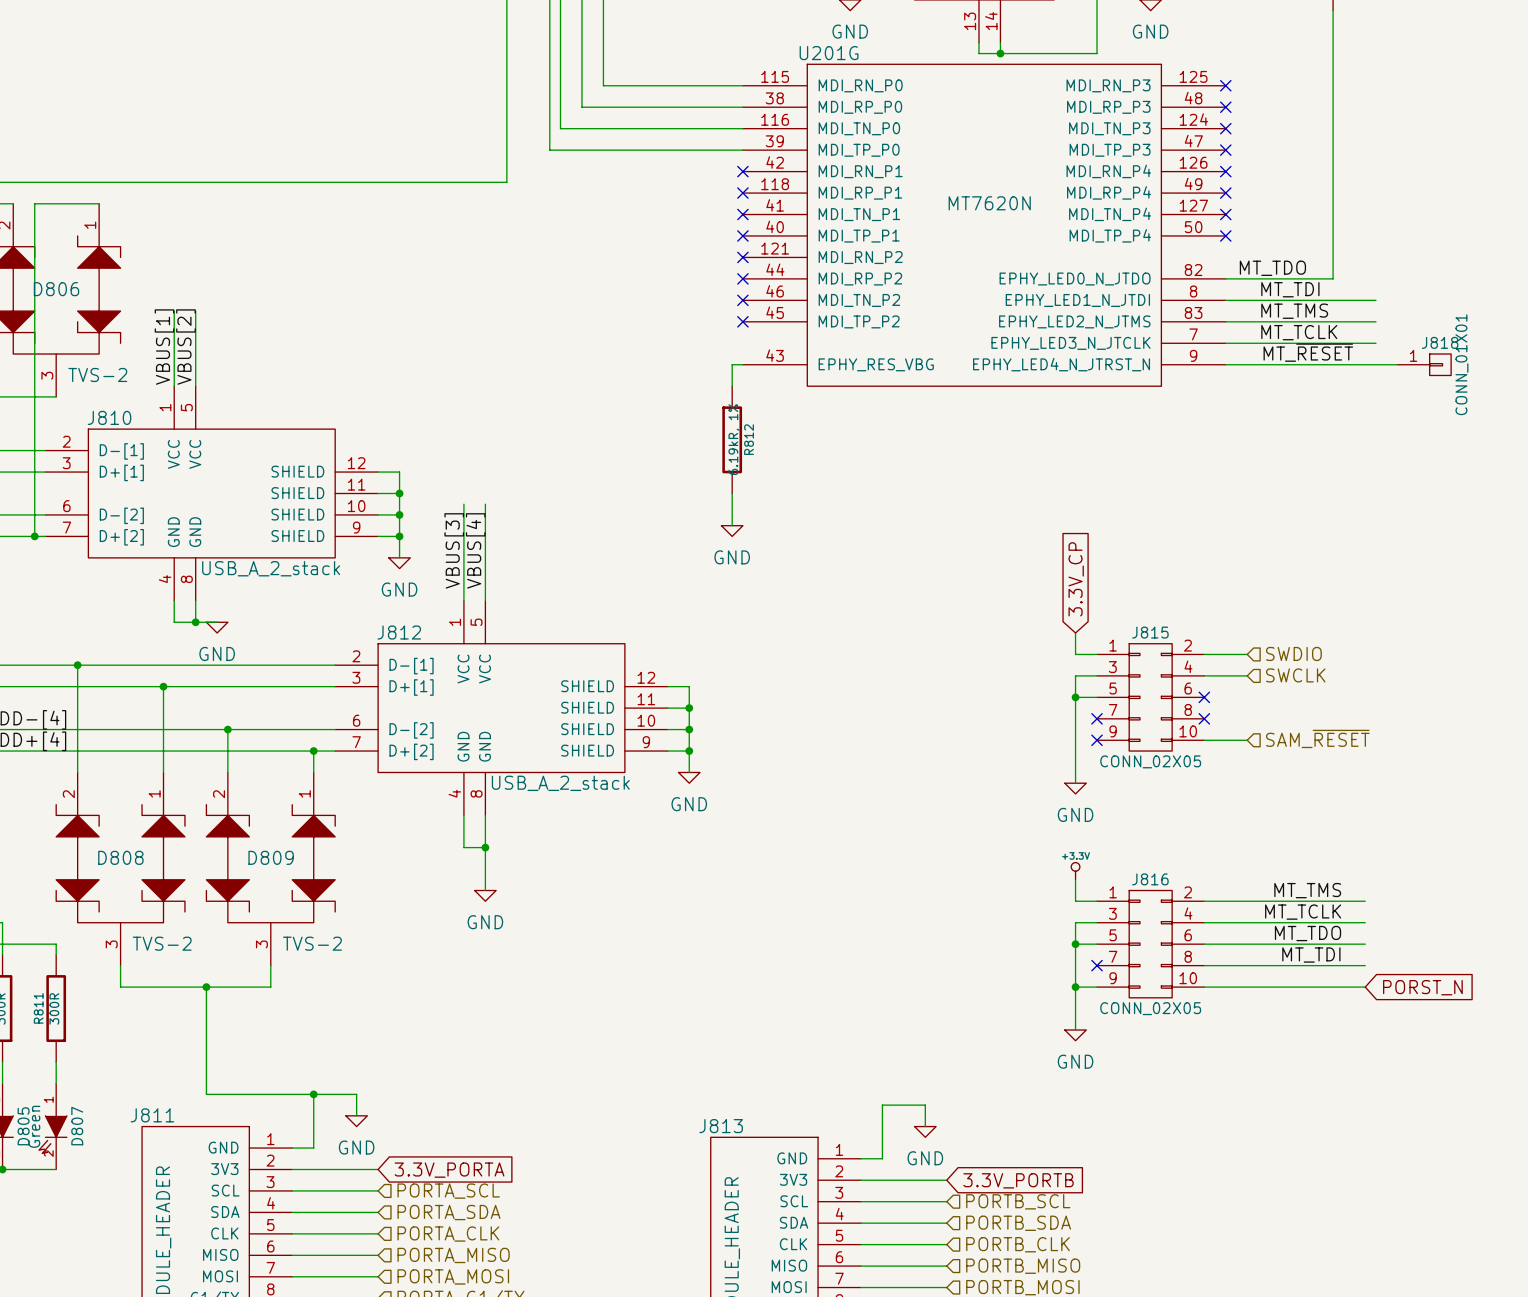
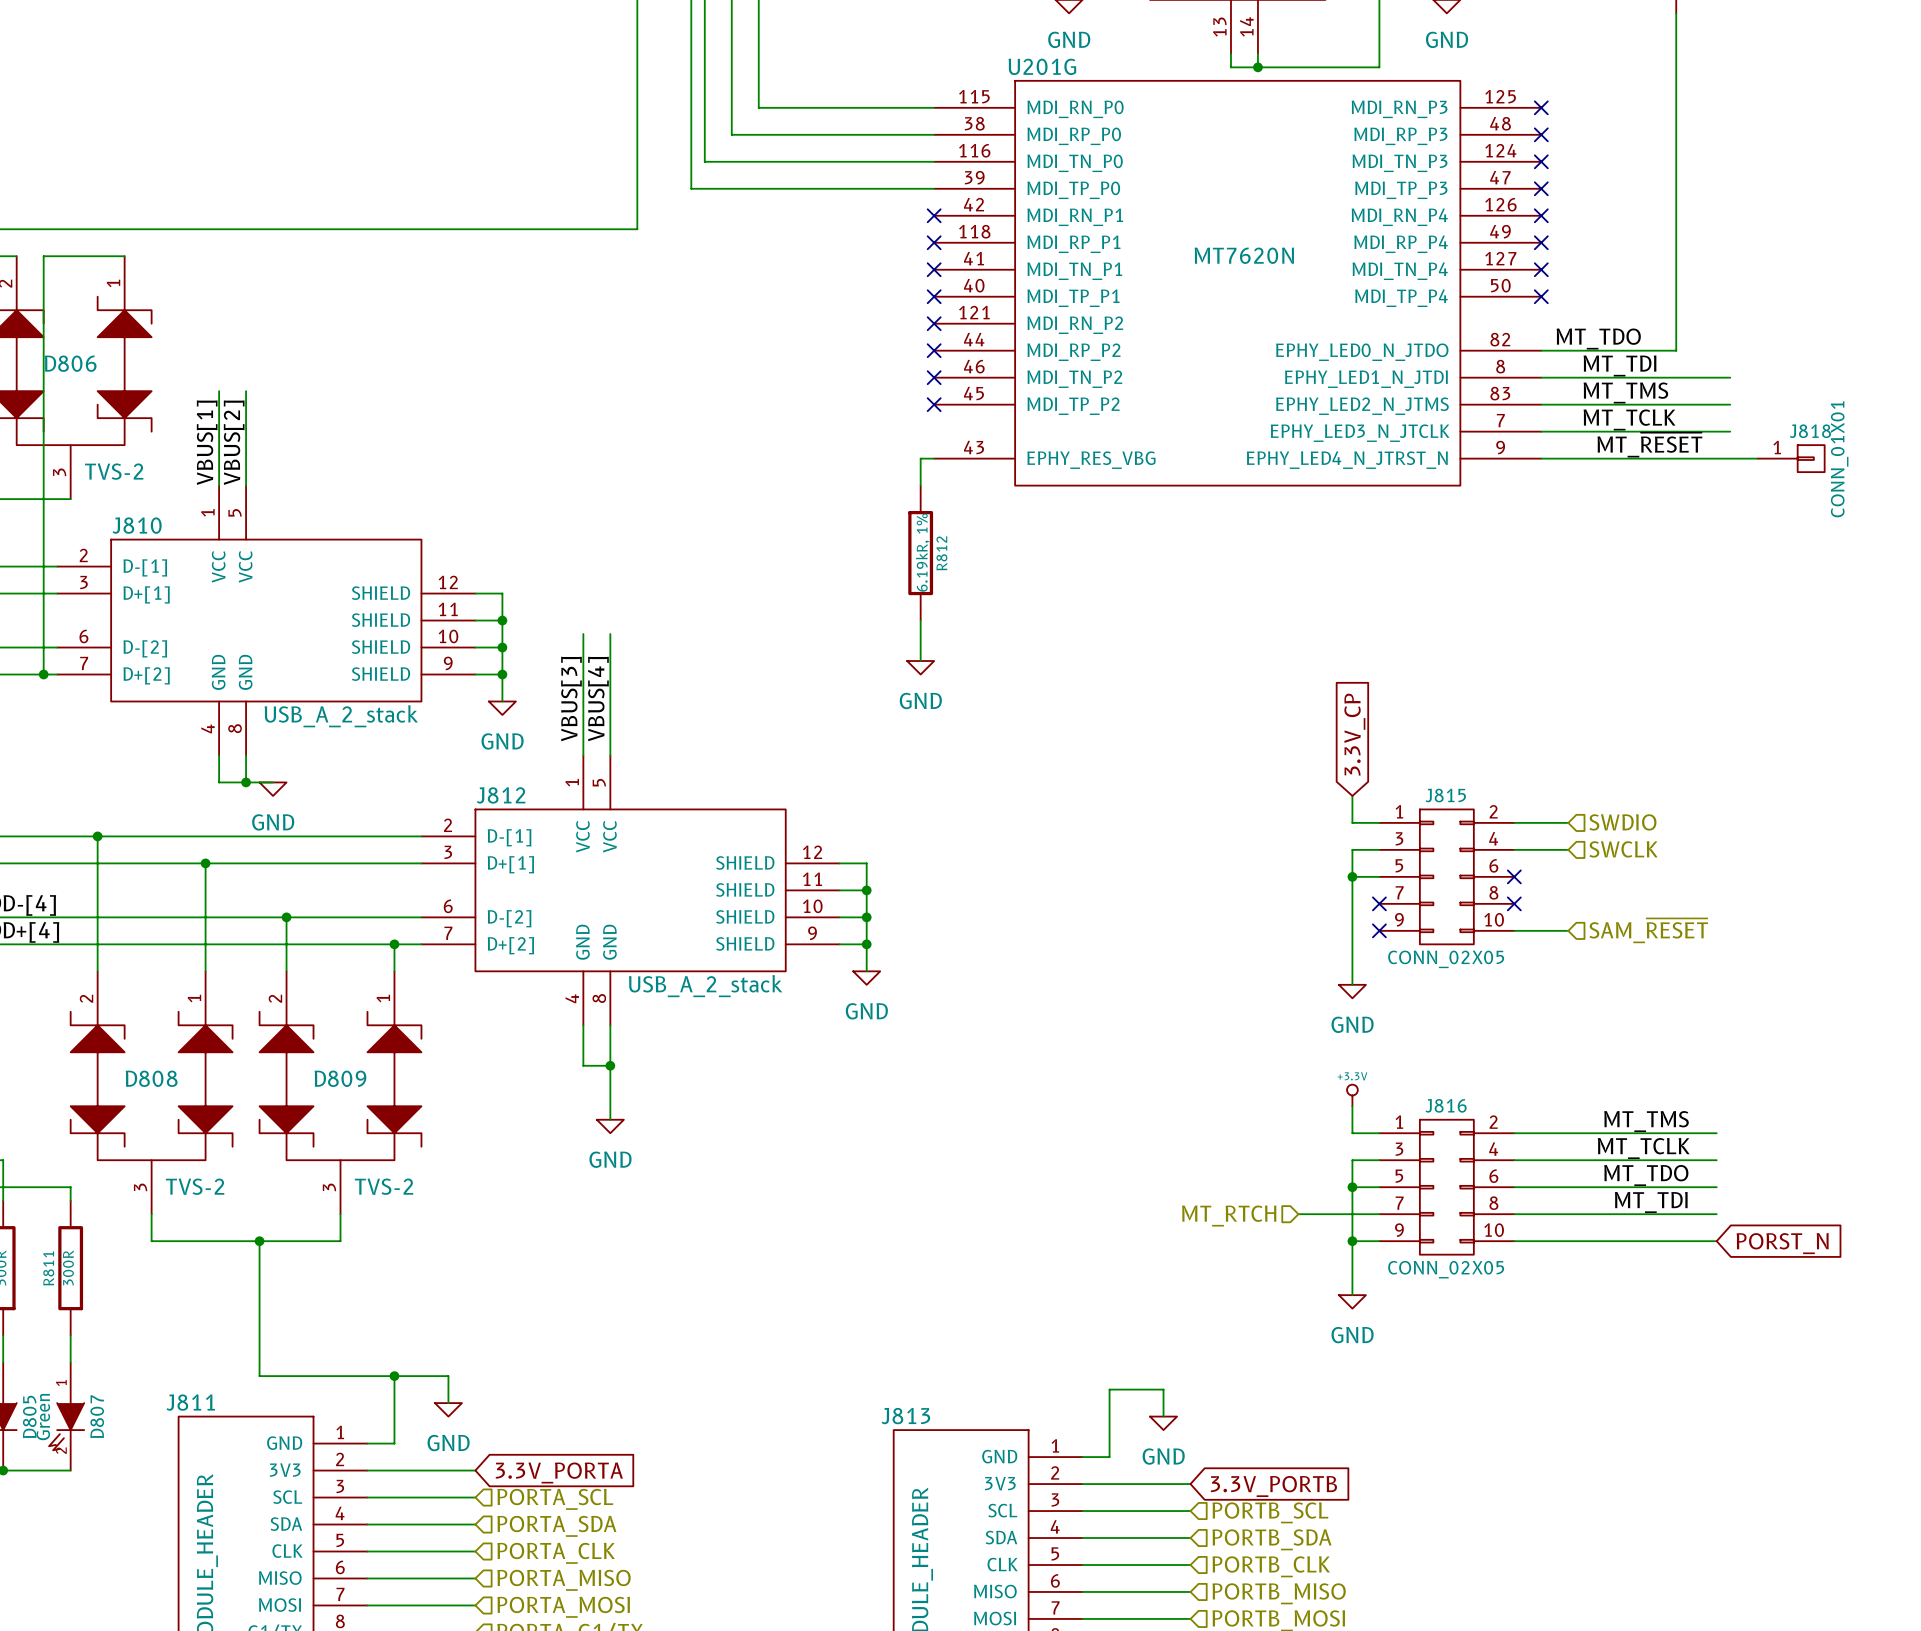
hierarchical label: none -> MT_RTCH (1229, 1216)
wire: none -> (1298, 1214) (1379, 1214)
no-connect mark: (1097, 965) -> none

